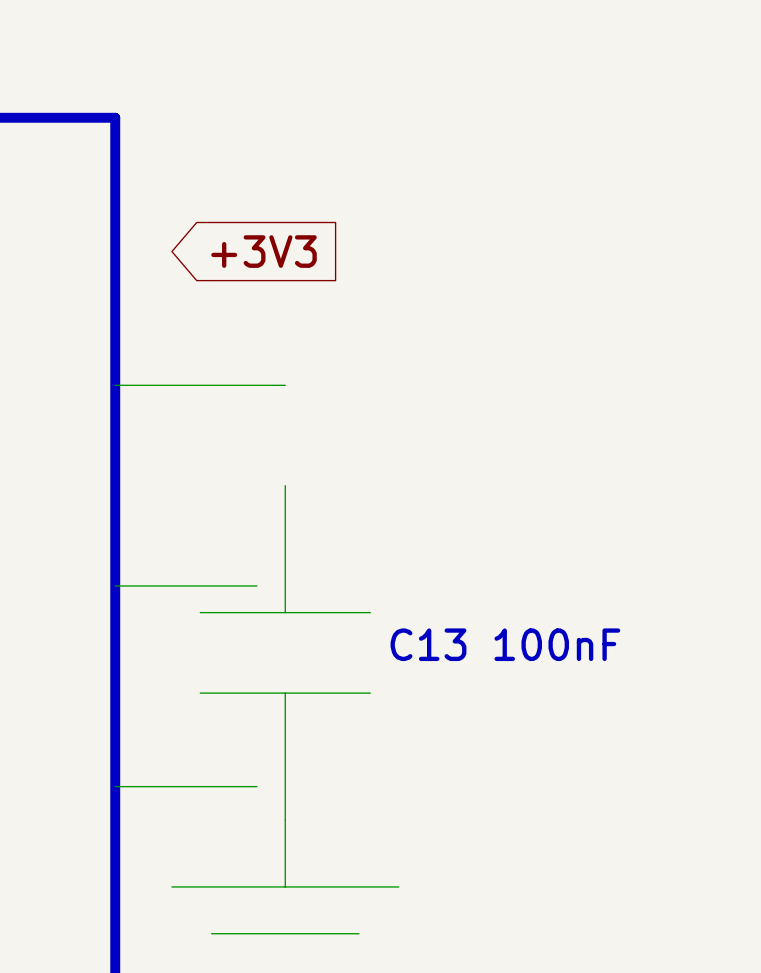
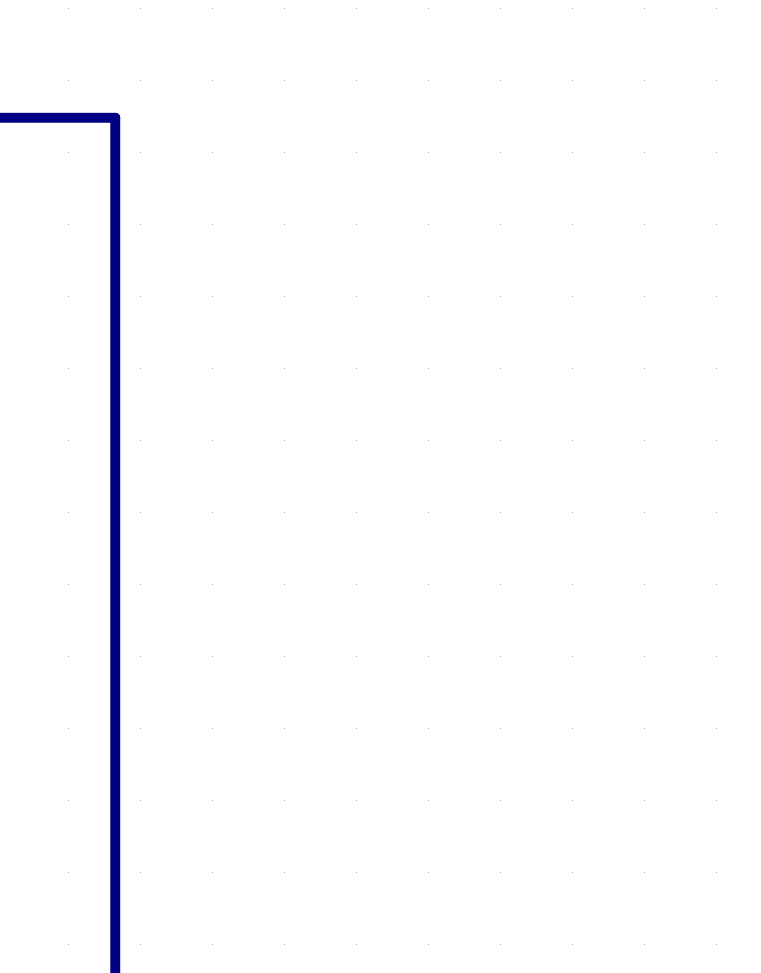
global label: +3V3 (264, 251) -> none
wire: (115, 385) (285, 385) -> none
wire: (285, 485) (285, 612) -> none
wire: (115, 585) (256, 585) -> none
wire: (200, 612) (370, 612) -> none
text: C13 100nF (505, 644) -> none
wire: (200, 693) (370, 693) -> none
wire: (285, 693) (285, 886) -> none
wire: (115, 786) (256, 786) -> none
wire: (171, 886) (398, 886) -> none
wire: (211, 933) (358, 933) -> none

